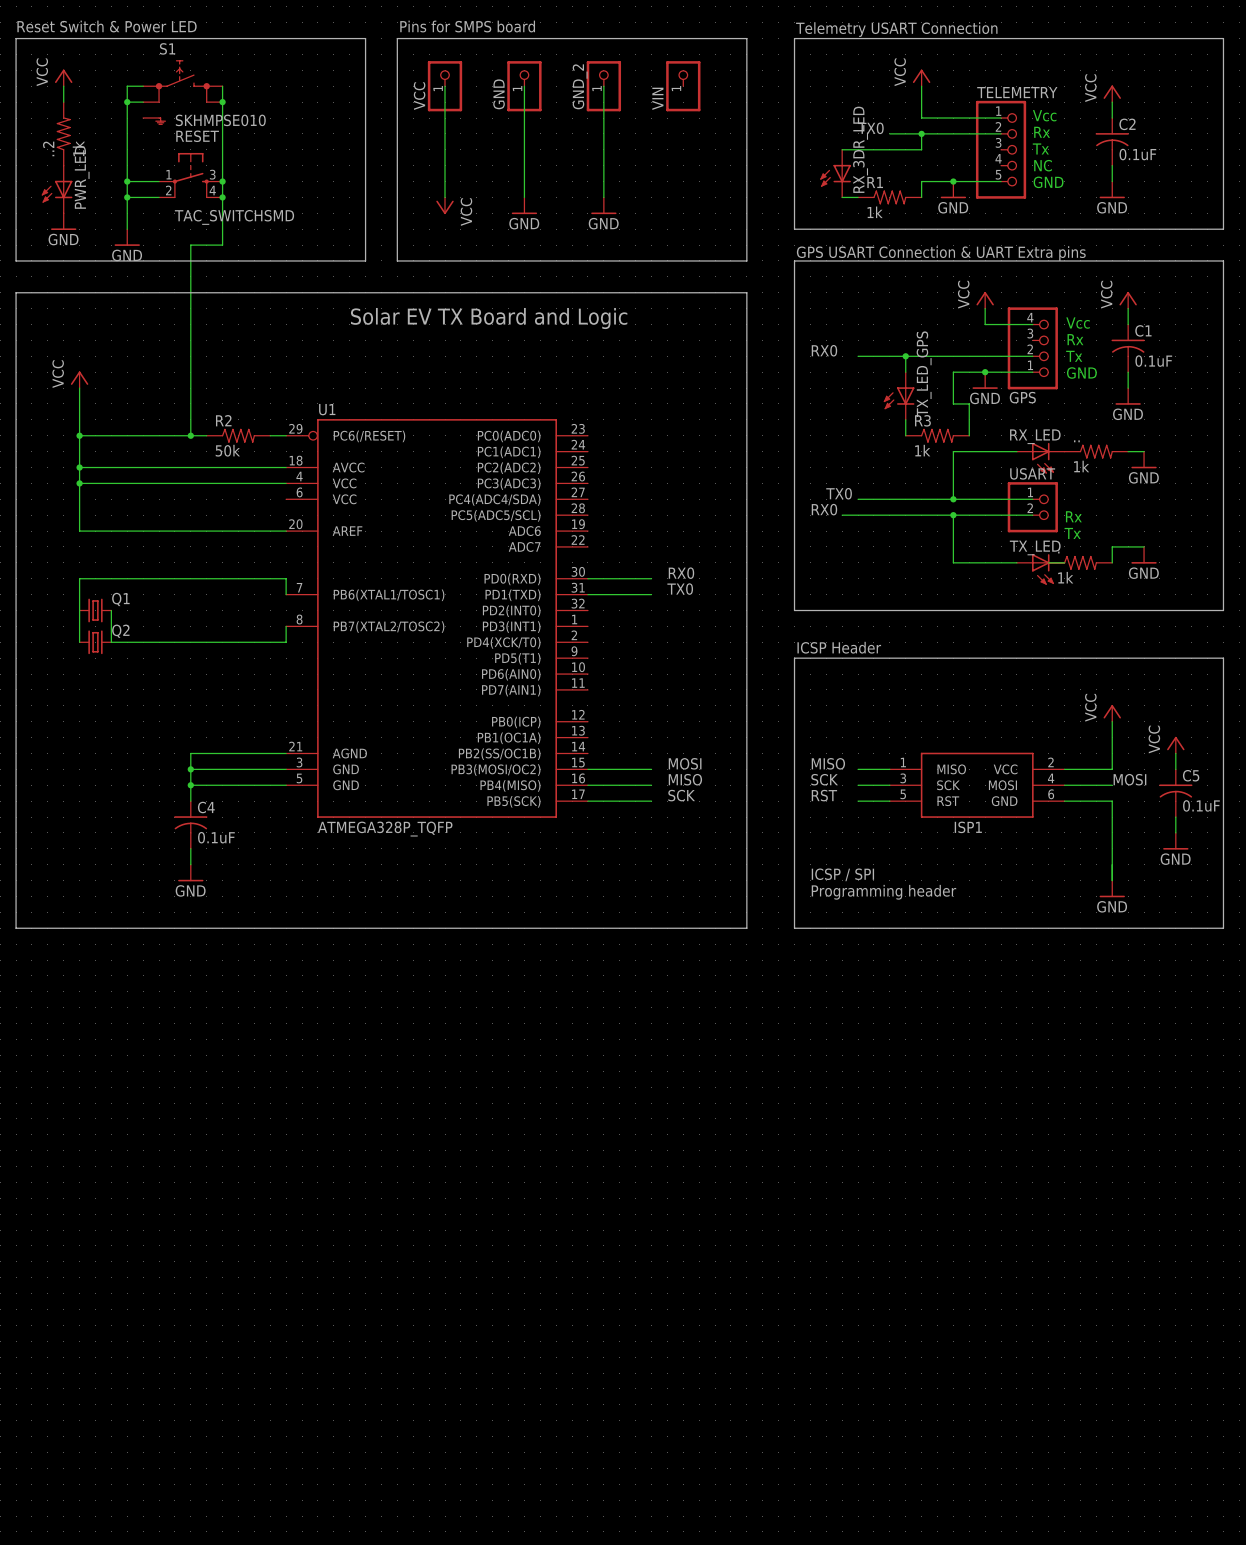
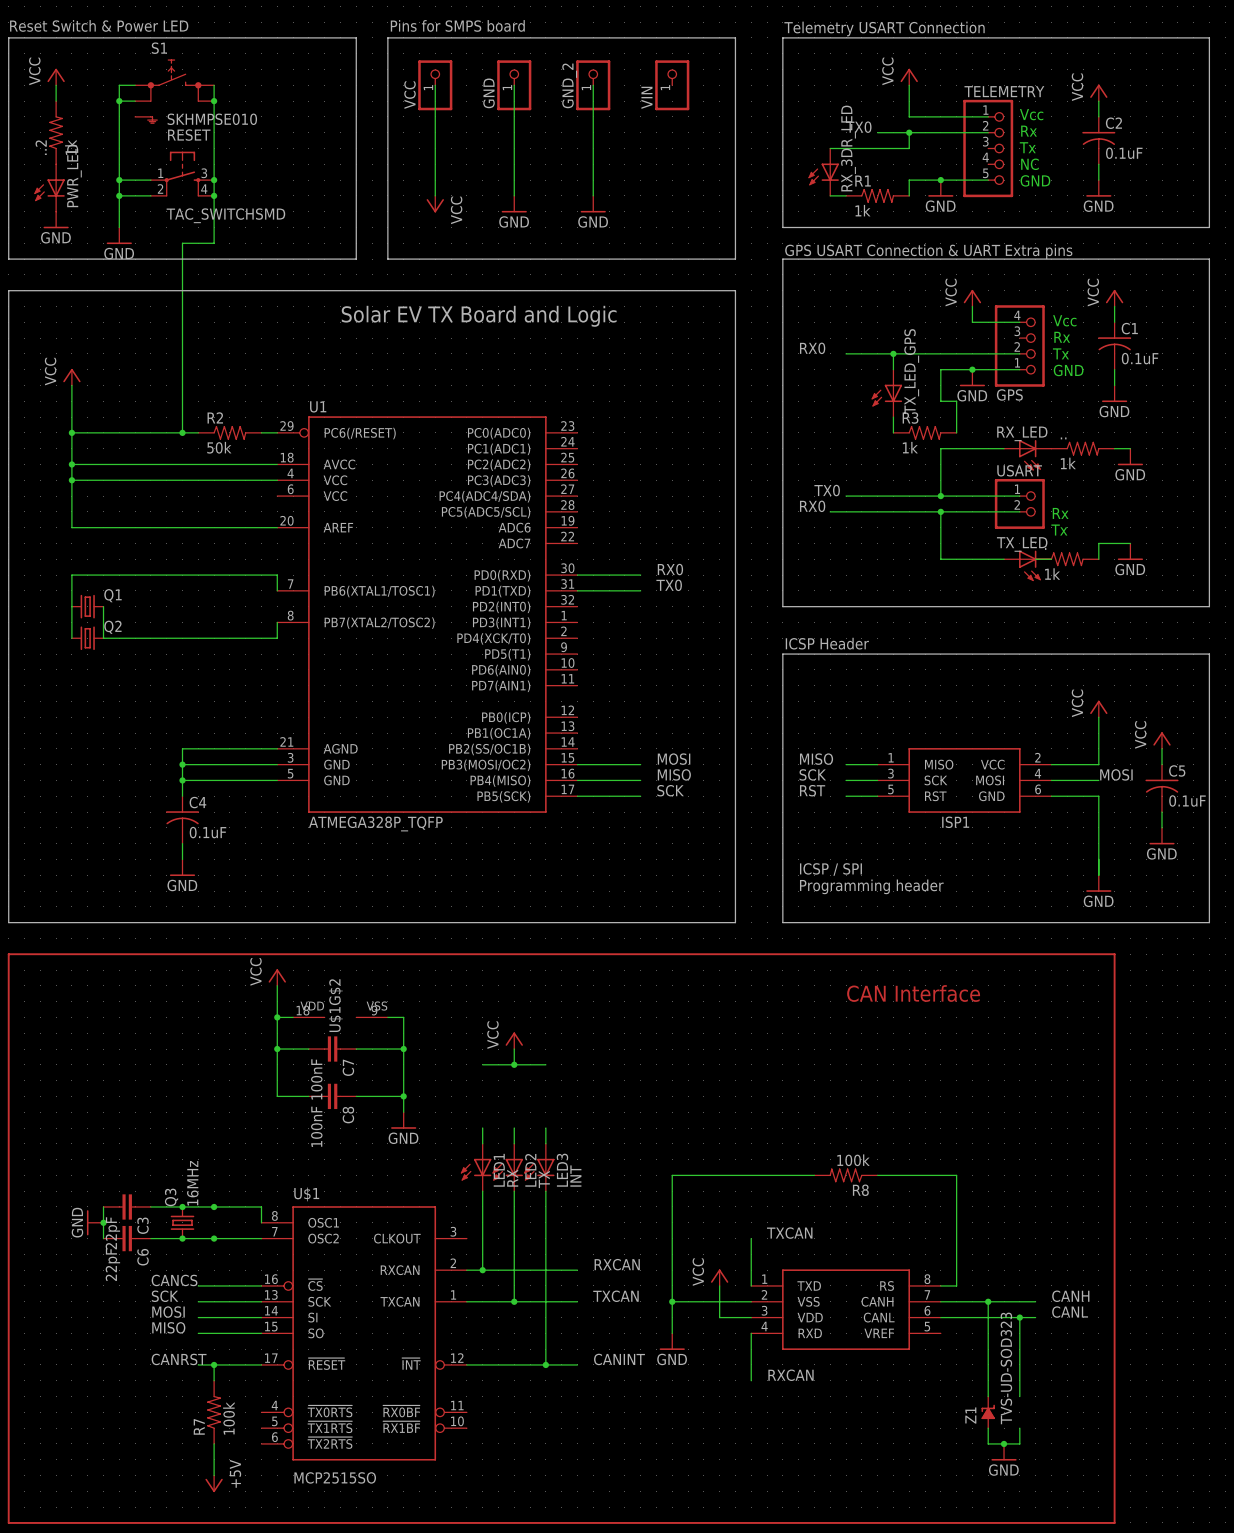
line: none -> (8, 954) (8, 1522) (1114, 1522) (1114, 954) (8, 954)
power symbol: none -> VCC (277, 977)
wire: none -> (277, 985) (277, 1096) (308, 1096)
text: none -> CAN Interface (913, 993)
wire: none -> (277, 1017) (293, 1017)
junction: none -> (277, 1017)
U$1G$2: none -> (340, 1017)
wire: none -> (387, 1017) (403, 1017) (403, 1112)
power symbol: none -> VCC (514, 1040)
wire: none -> (277, 1049) (308, 1049)
junction: none -> (277, 1049)
C7: none -> 100nF (332, 1049)
wire: none -> (356, 1049) (403, 1049)
junction: none -> (403, 1049)
wire: none -> (514, 1049) (514, 1064)
wire: none -> (482, 1064) (545, 1064)
junction: none -> (514, 1064)
C8: none -> 100nF (332, 1096)
wire: none -> (356, 1096) (403, 1096)
junction: none -> (403, 1096)
power symbol: none -> GND (403, 1120)
wire: none -> (482, 1128) (482, 1143)
wire: none -> (514, 1128) (514, 1143)
wire: none -> (545, 1128) (545, 1143)
LED1: none -> RX (476, 1167)
LED2: none -> TX (507, 1167)
LED3: none -> INT (539, 1167)
wire: none -> (814, 1175) (672, 1175) (672, 1333)
R8: none -> 100k (846, 1175)
wire: none -> (877, 1175) (956, 1175) (956, 1285) (940, 1285)
wire: none -> (482, 1191) (482, 1270)
wire: none -> (514, 1191) (514, 1301)
wire: none -> (545, 1191) (545, 1364)
wire: none -> (103, 1206) (103, 1238)
C3: none -> 22pF (127, 1206)
wire: none -> (150, 1206) (261, 1206) (261, 1222)
junction: none -> (182, 1206)
junction: none -> (214, 1206)
power symbol: none -> GND (95, 1222)
junction: none -> (103, 1222)
Q3: none -> 16MHz (182, 1222)
label: none -> TXCAN (789, 1233)
C6: none -> 22pF (127, 1238)
wire: none -> (150, 1238) (261, 1238)
junction: none -> (182, 1238)
junction: none -> (214, 1238)
wire: none -> (751, 1238) (751, 1285)
label: none -> RXCAN (617, 1264)
wire: none -> (466, 1270) (577, 1270)
junction: none -> (482, 1270)
power symbol: none -> VCC (719, 1277)
label: none -> CANCS (174, 1280)
wire: none -> (198, 1285) (261, 1285)
wire: none -> (719, 1285) (719, 1317) (751, 1317)
label: none -> SCK (165, 1296)
label: none -> TXCAN (615, 1296)
label: none -> CANH (1070, 1296)
wire: none -> (198, 1301) (261, 1301)
wire: none -> (466, 1301) (577, 1301)
junction: none -> (514, 1301)
wire: none -> (672, 1301) (751, 1301)
junction: none -> (672, 1301)
wire: none -> (940, 1301) (1035, 1301)
wire: none -> (988, 1301) (988, 1396)
junction: none -> (988, 1301)
part: none -> (846, 1309)
label: none -> MOSI (168, 1312)
label: none -> CANL (1070, 1312)
wire: none -> (198, 1317) (261, 1317)
wire: none -> (940, 1317) (1035, 1317)
wire: none -> (1019, 1317) (1019, 1396)
junction: none -> (1019, 1317)
label: none -> MISO (168, 1327)
wire: none -> (198, 1333) (261, 1333)
U$1: none -> MCP2515SO (364, 1333)
wire: none -> (751, 1333) (751, 1380)
power symbol: none -> GND (672, 1341)
label: none -> CANRST (179, 1359)
label: none -> CANINT (619, 1359)
wire: none -> (198, 1364) (261, 1364)
wire: none -> (214, 1364) (214, 1380)
junction: none -> (214, 1364)
wire: none -> (466, 1364) (577, 1364)
junction: none -> (545, 1364)
label: none -> RXCAN (791, 1375)
R7: none -> 100k (214, 1412)
Z1: none -> TVS-UD-SOD323 (988, 1412)
wire: none -> (988, 1428) (988, 1443) (1019, 1443) (1019, 1428)
wire: none -> (214, 1443) (214, 1475)
junction: none -> (1004, 1443)
power symbol: none -> GND (1004, 1452)
power symbol: none -> +5V (214, 1483)

